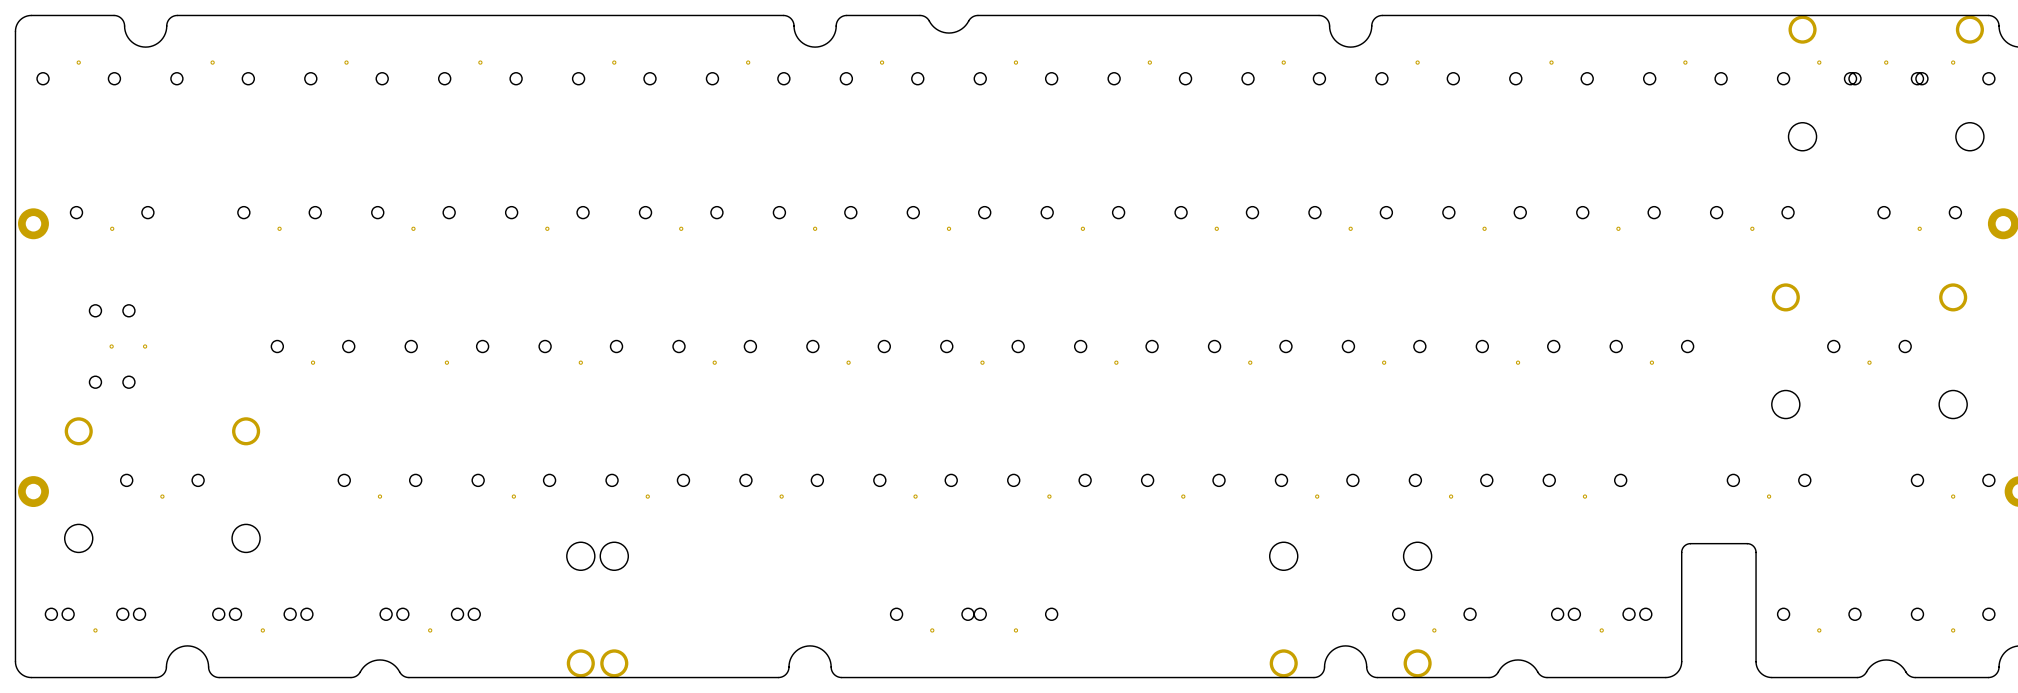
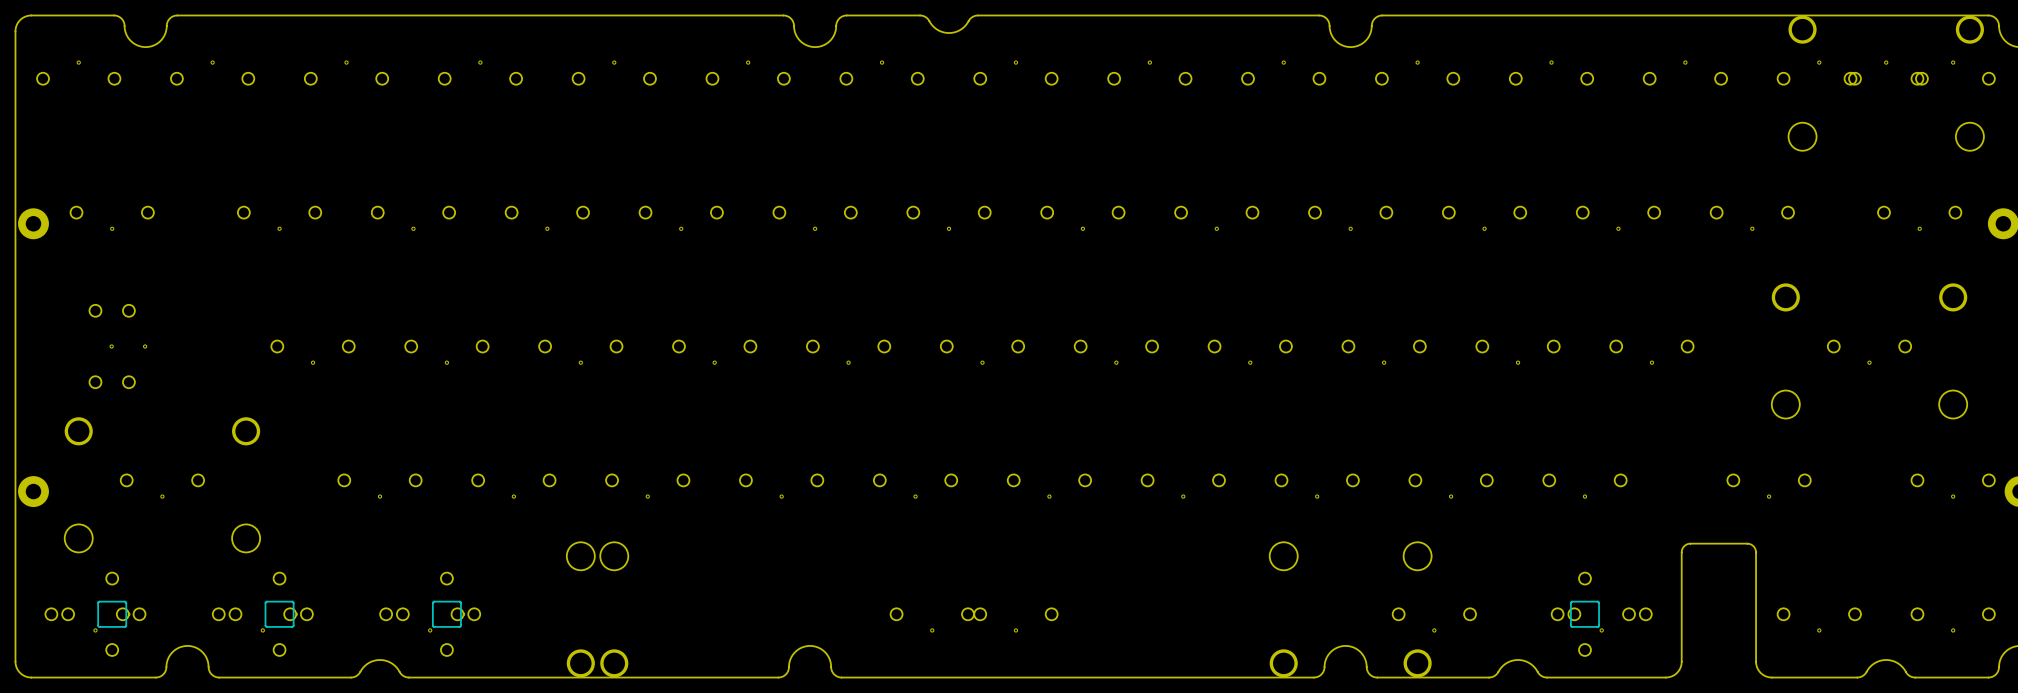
part: none -> (114, 614)
part: none -> (281, 614)
part: none -> (448, 614)
part: none -> (1584, 614)

